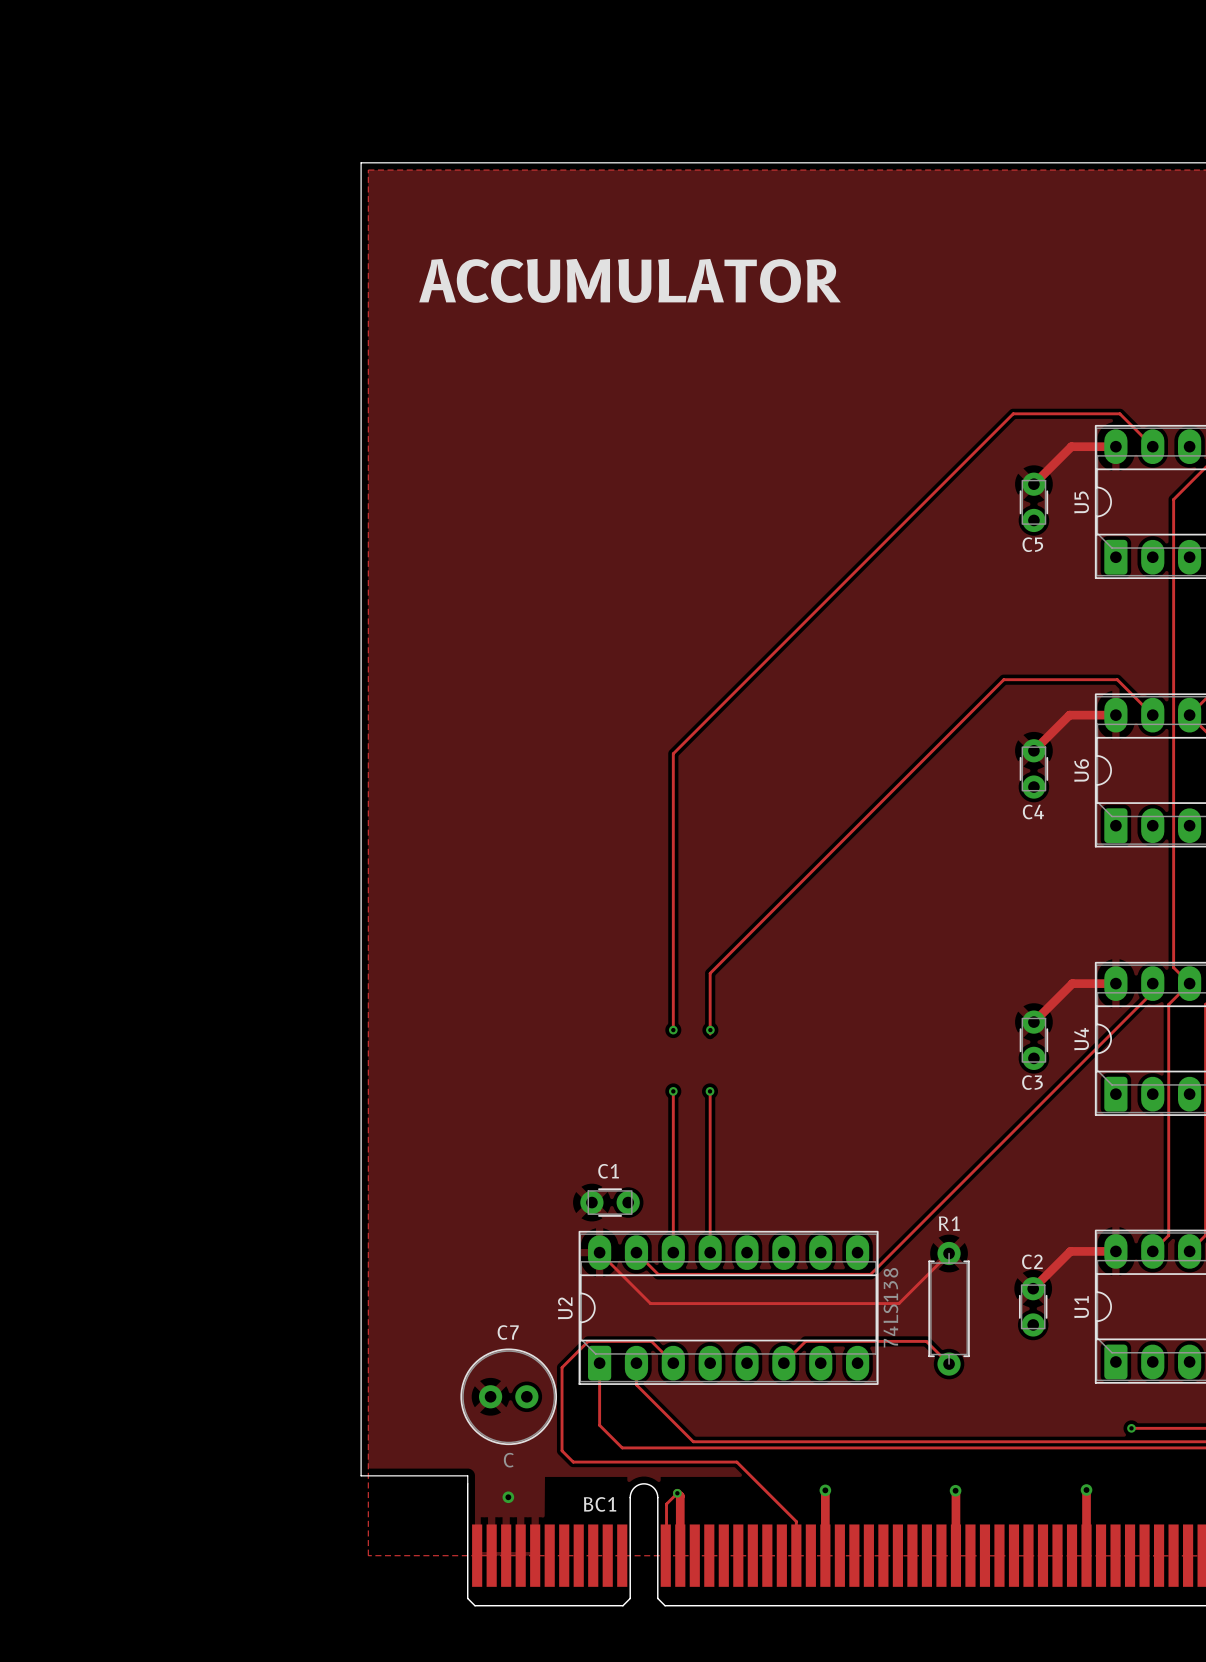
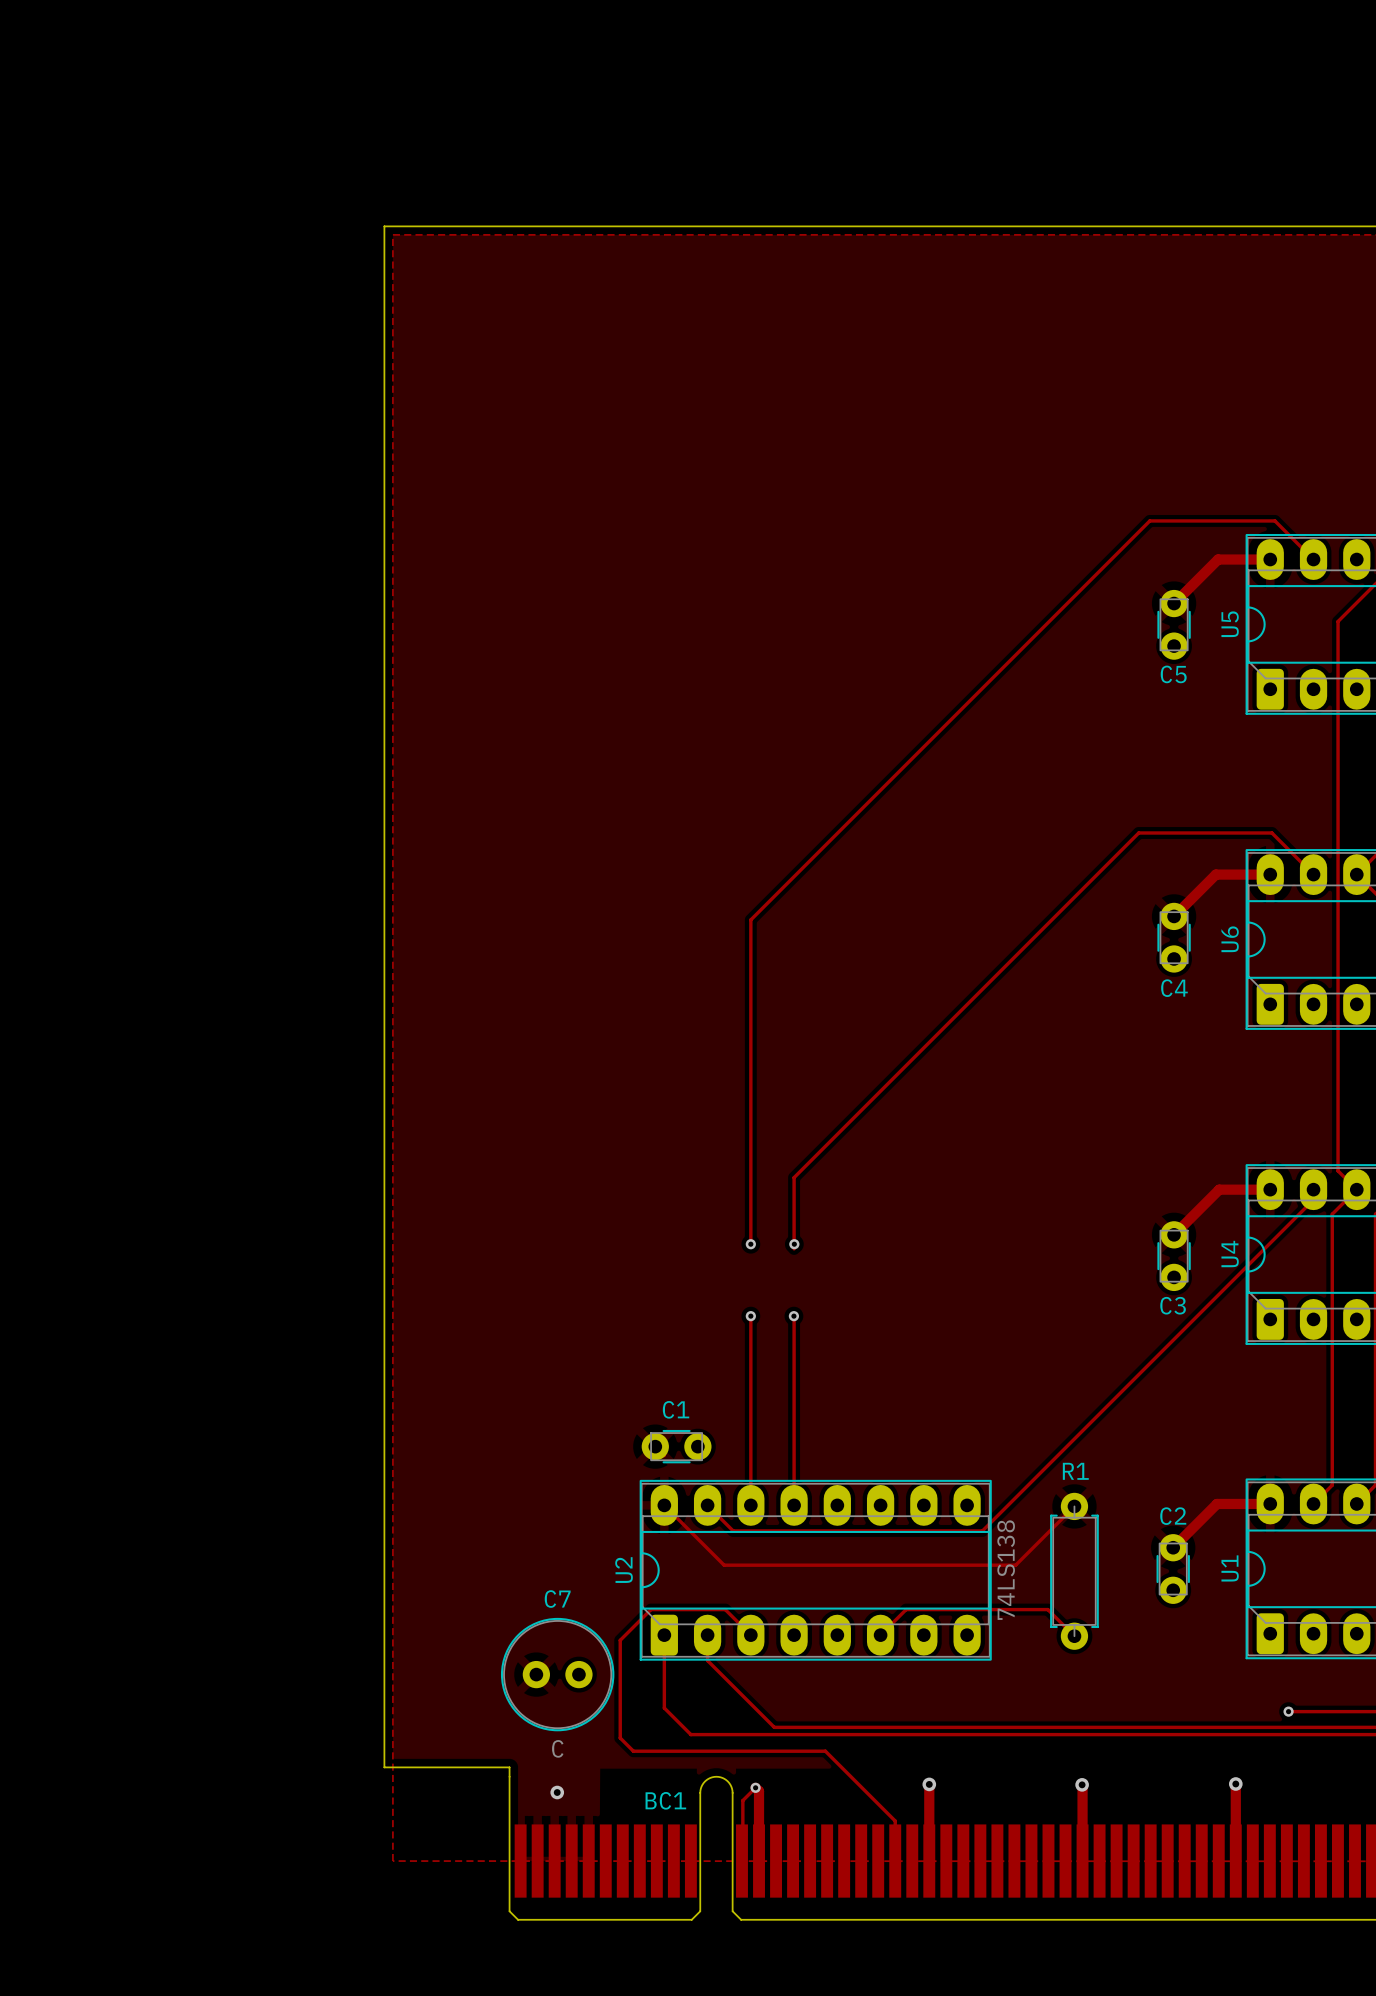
text: ACCUMULATOR (630, 280) -> none

